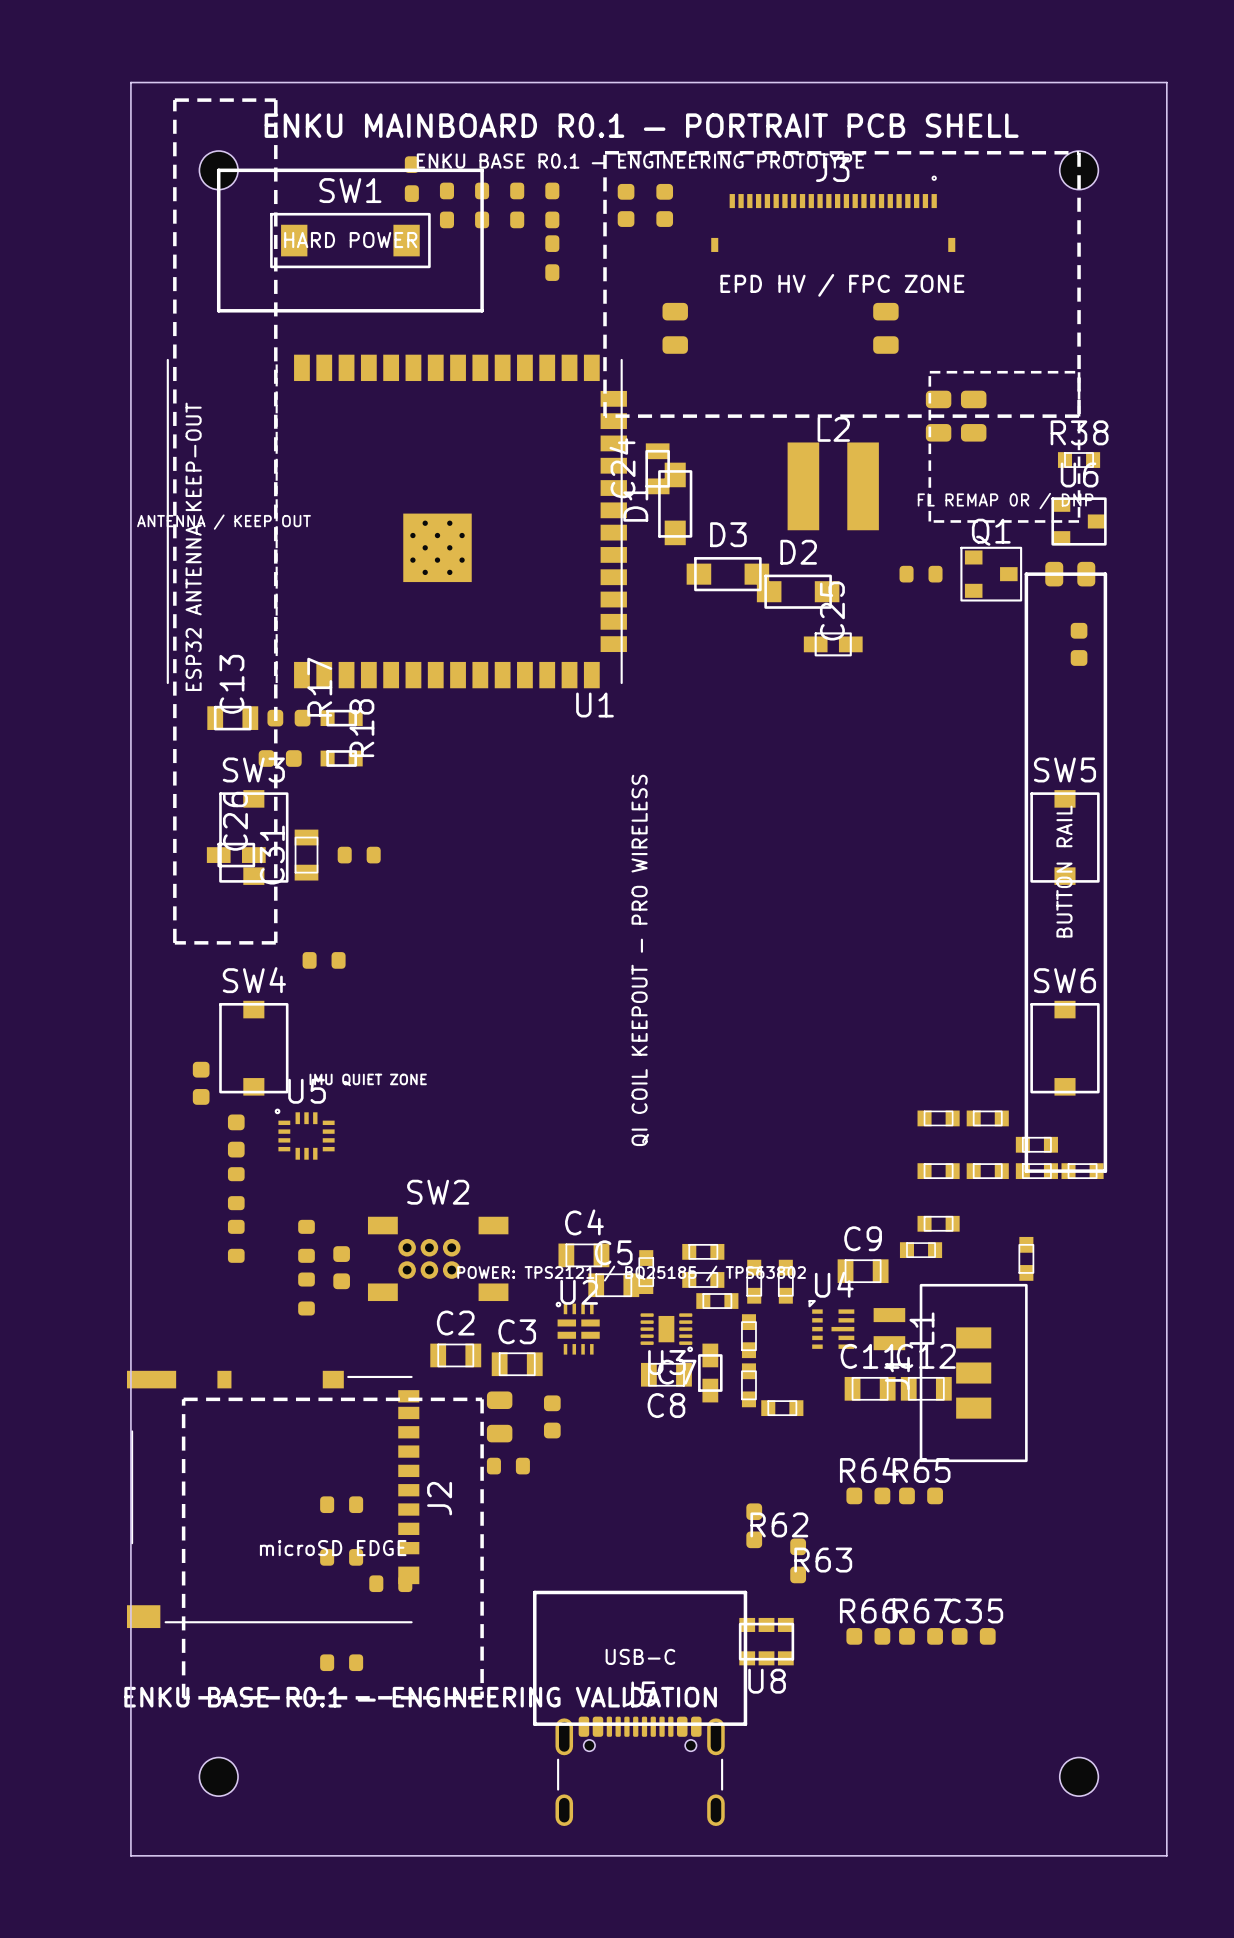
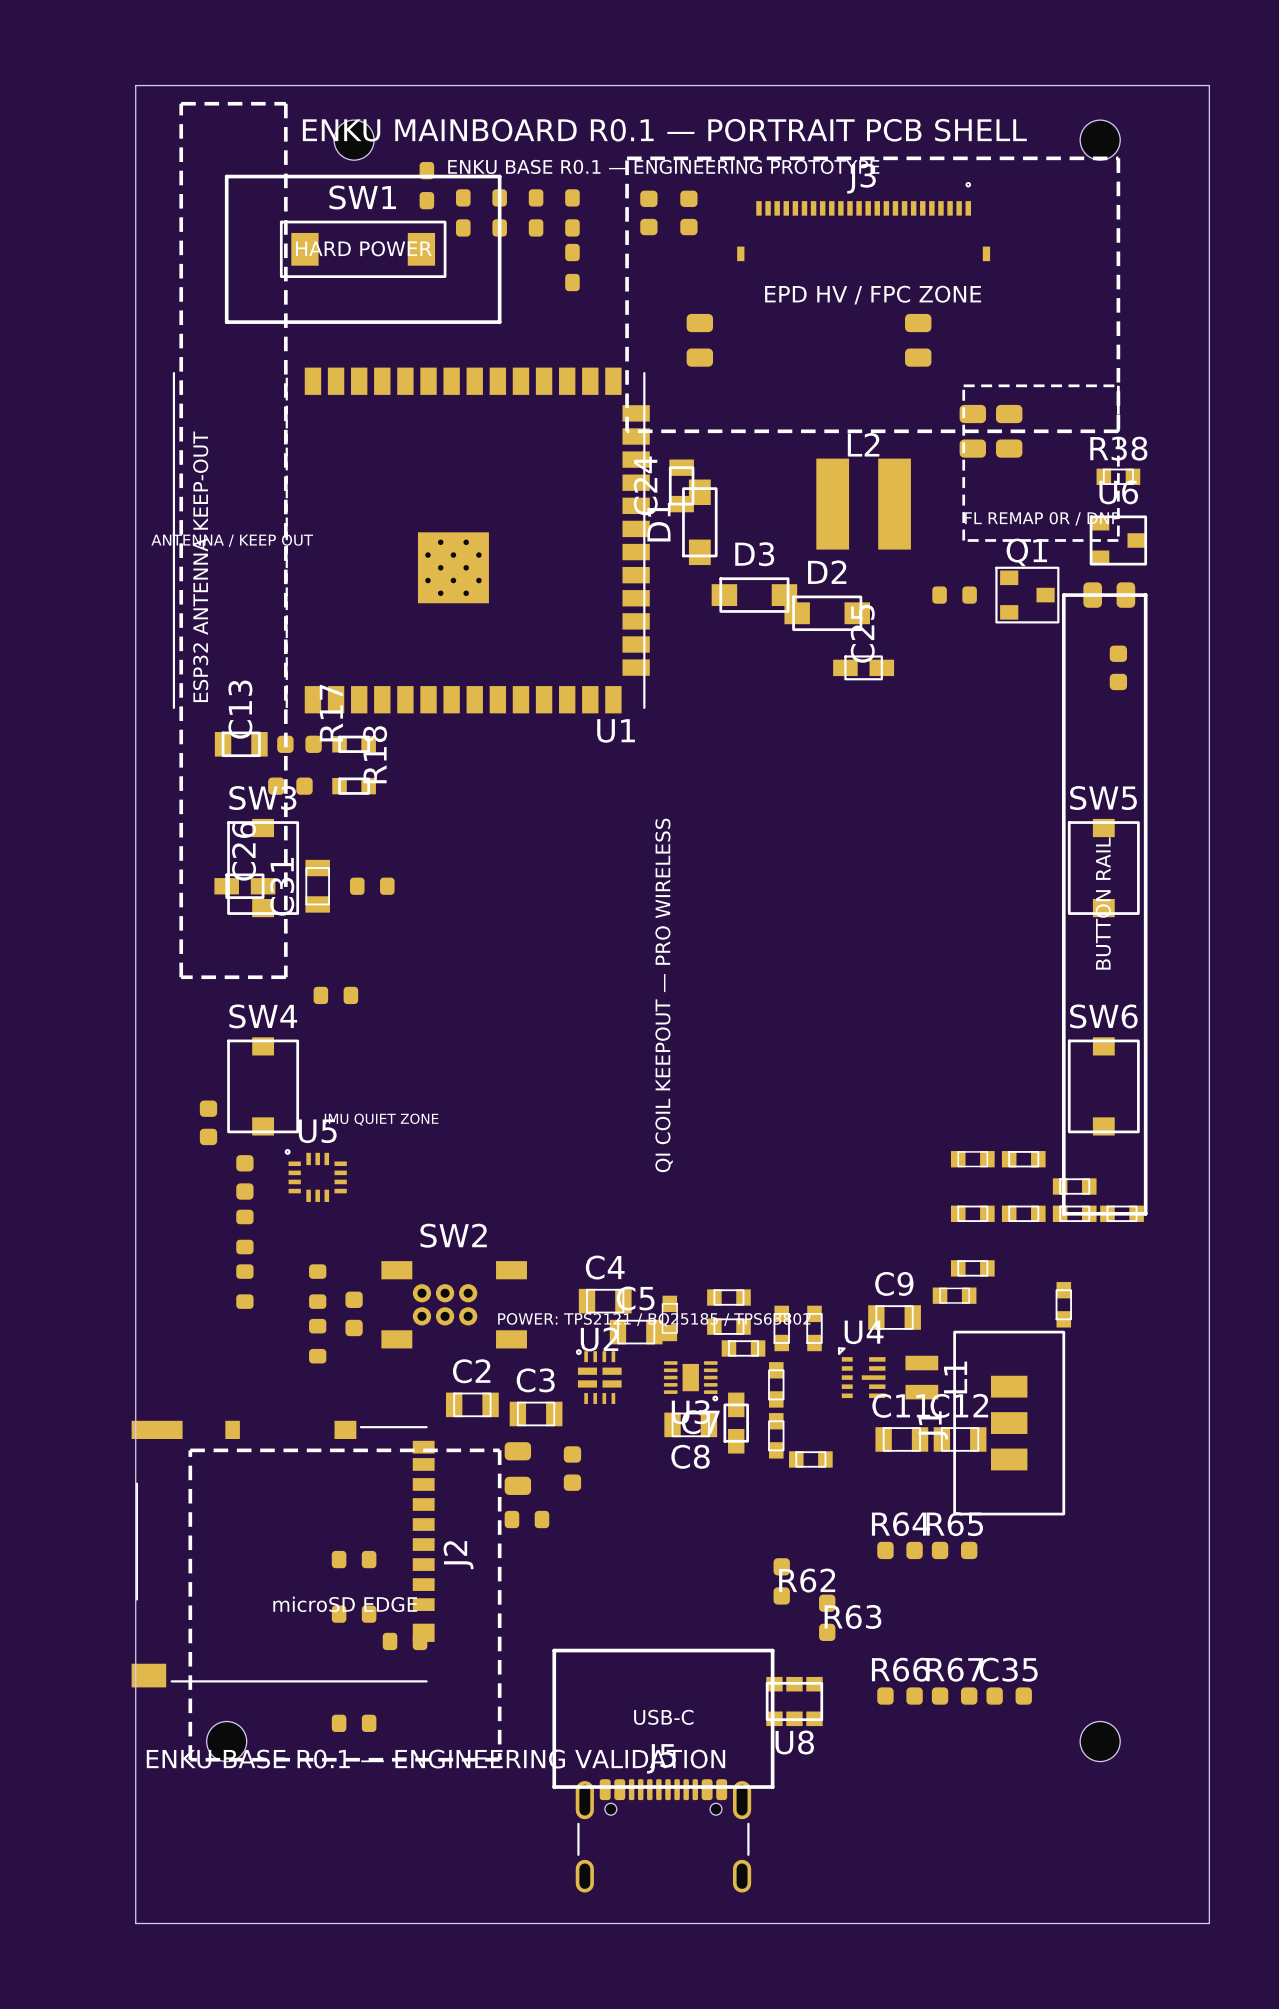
part position: (218, 170) -> (354, 140)
part position: (1079, 170) -> (1100, 140)
part position: (218, 1776) -> (226, 1741)
part position: (1079, 1776) -> (1100, 1741)

